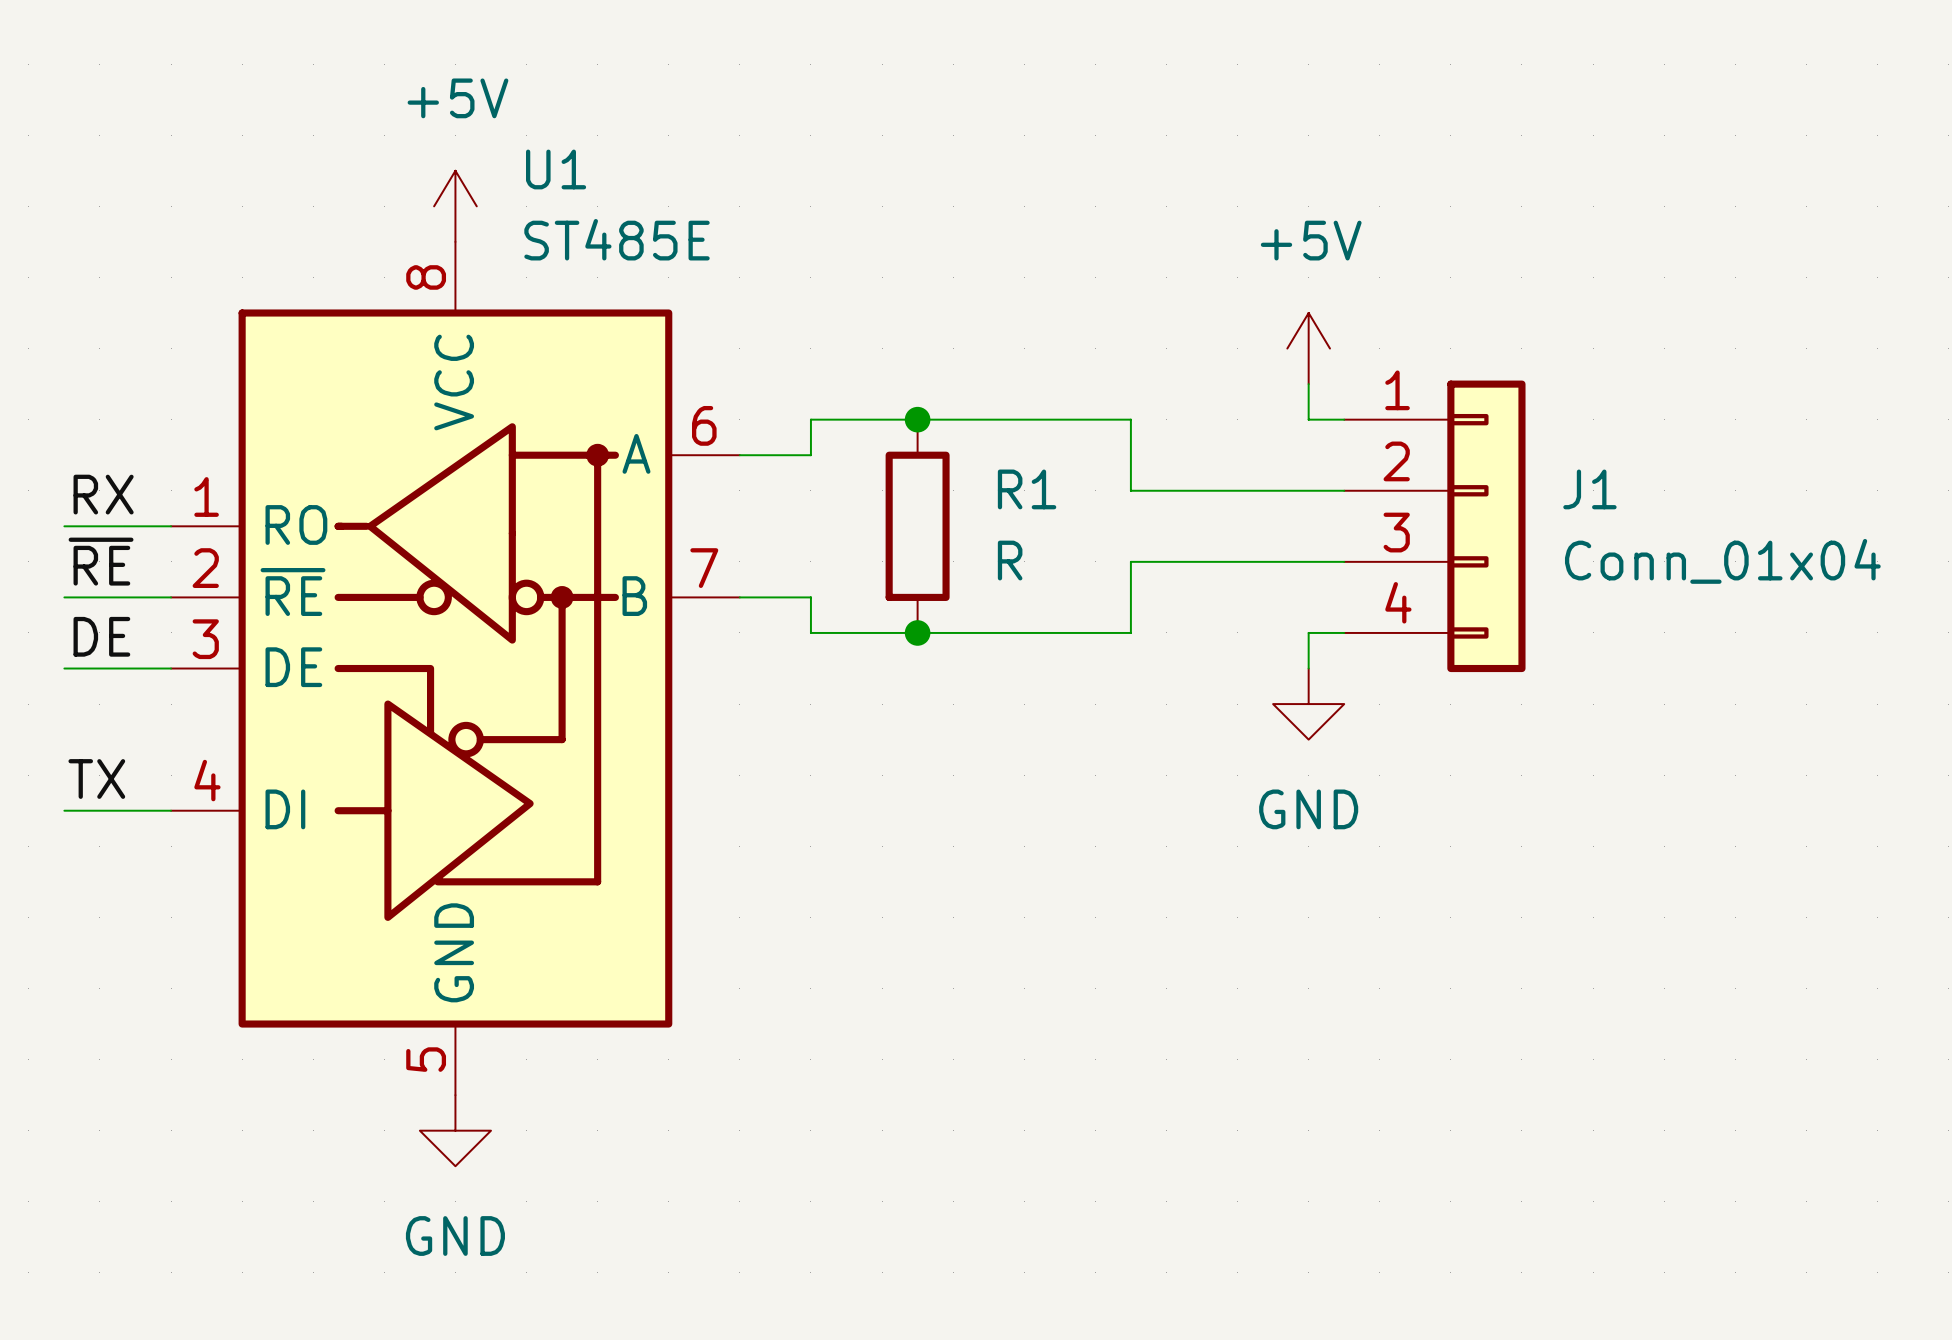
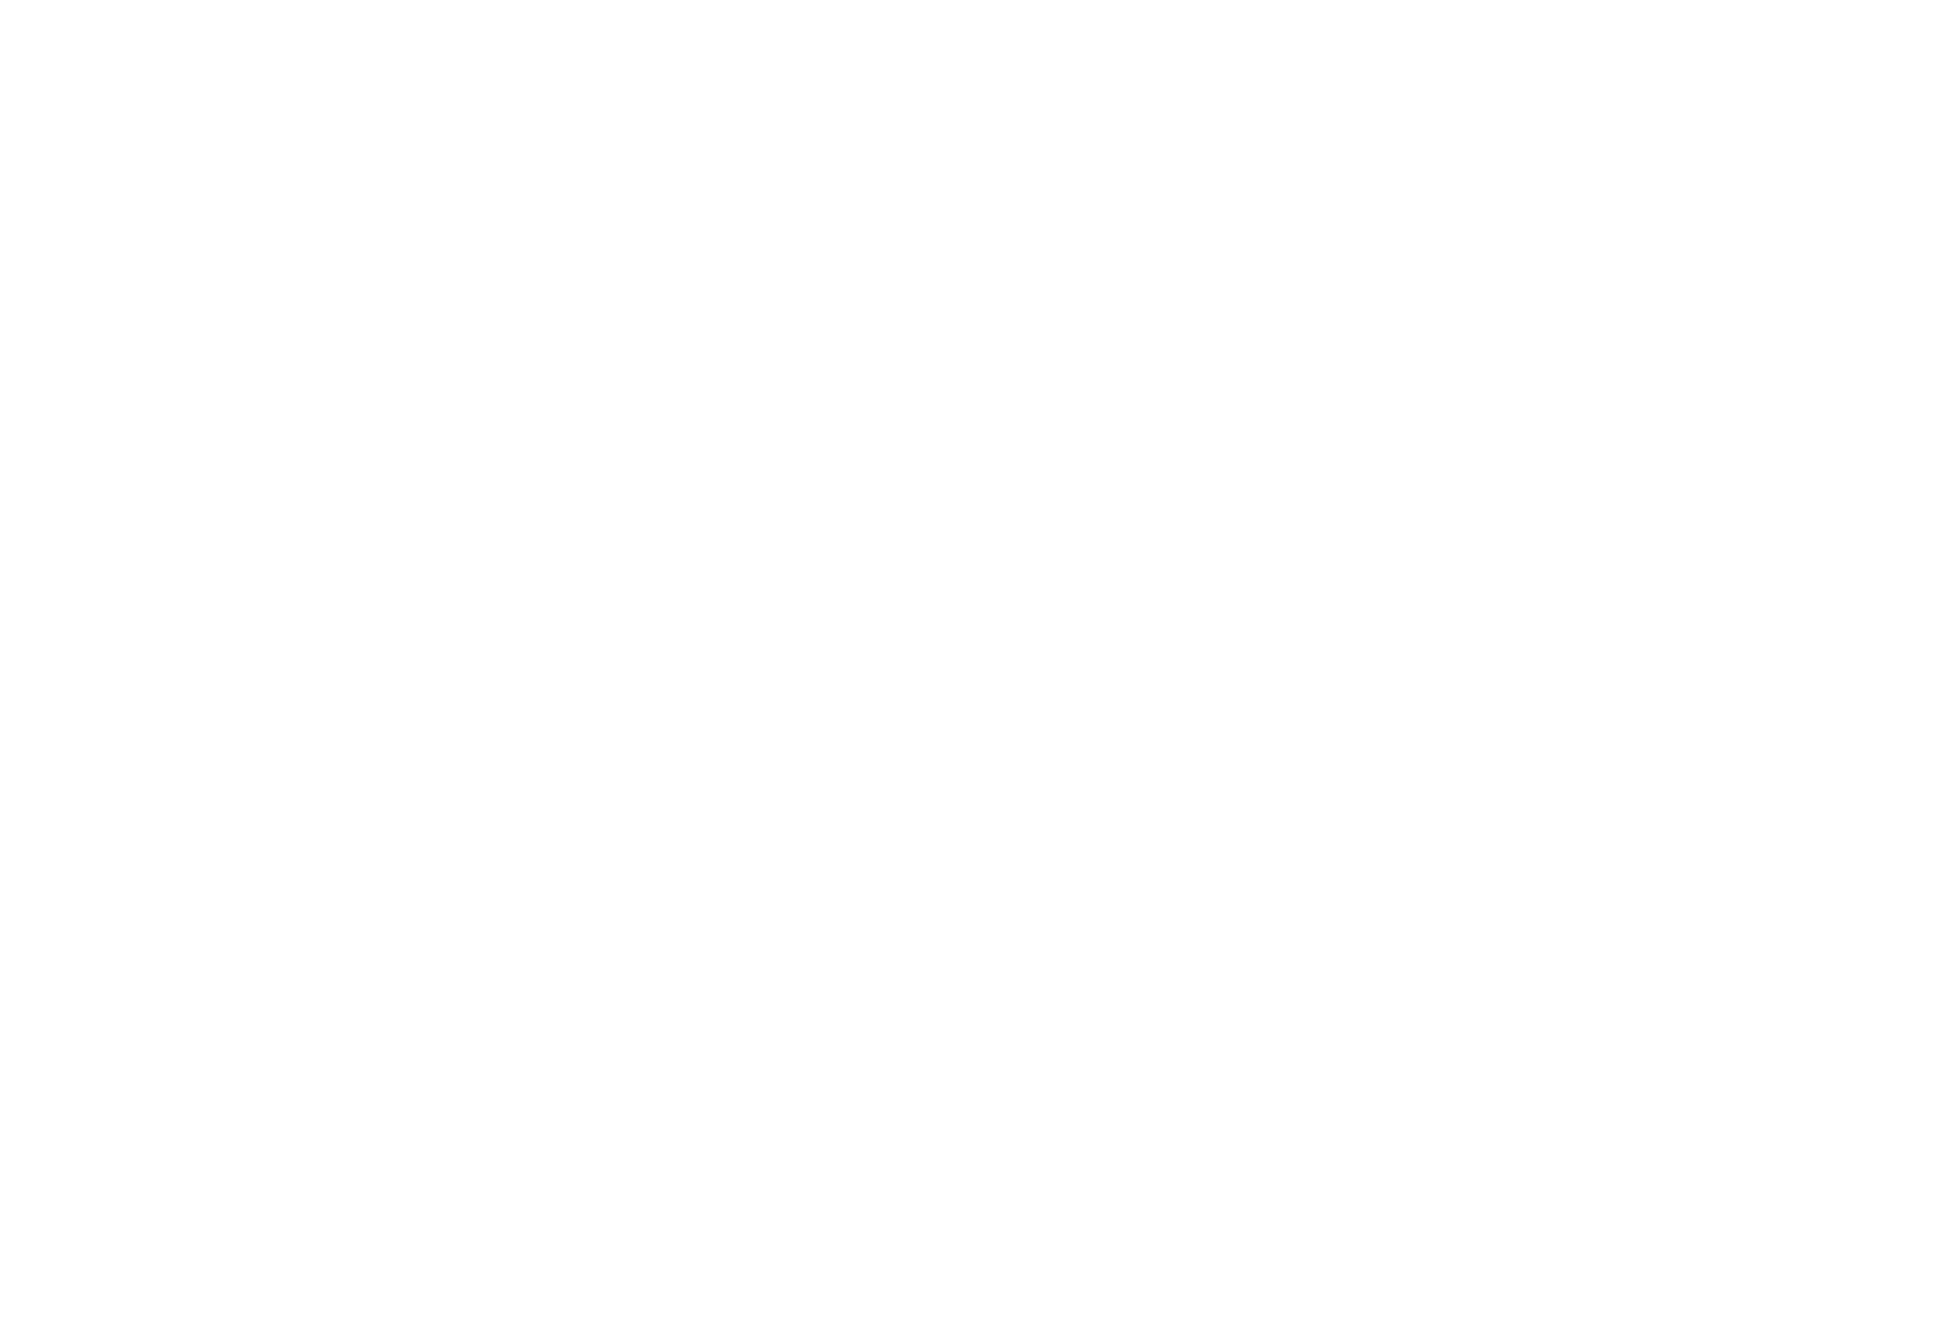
power symbol: +5V (455, 206) -> none
power symbol: +5V (1308, 348) -> none
wire: (1308, 384) (1308, 419) (1344, 419) -> none
junction: (917, 419) -> none
wire: (739, 455) (810, 455) (810, 419) (1130, 419) (1130, 490) (1344, 490) -> none
label: RX (103, 494) -> none
wire: (64, 526) (171, 526) -> none
R1: R (917, 526) -> none
J1: Conn_01x04 (1434, 526) -> none
label: ~{RE} (101, 561) -> none
wire: (1344, 561) (1130, 561) (1130, 632) (810, 632) (810, 597) (739, 597) -> none
wire: (64, 597) (171, 597) -> none
junction: (917, 632) -> none
wire: (1344, 632) (1308, 632) (1308, 668) -> none
label: DE (101, 636) -> none
wire: (64, 668) (171, 668) -> none
U1: ST485E (455, 668) -> none
power symbol: GND (1308, 704) -> none
label: TX (96, 778) -> none
wire: (64, 810) (171, 810) -> none
power symbol: GND (455, 1130) -> none

